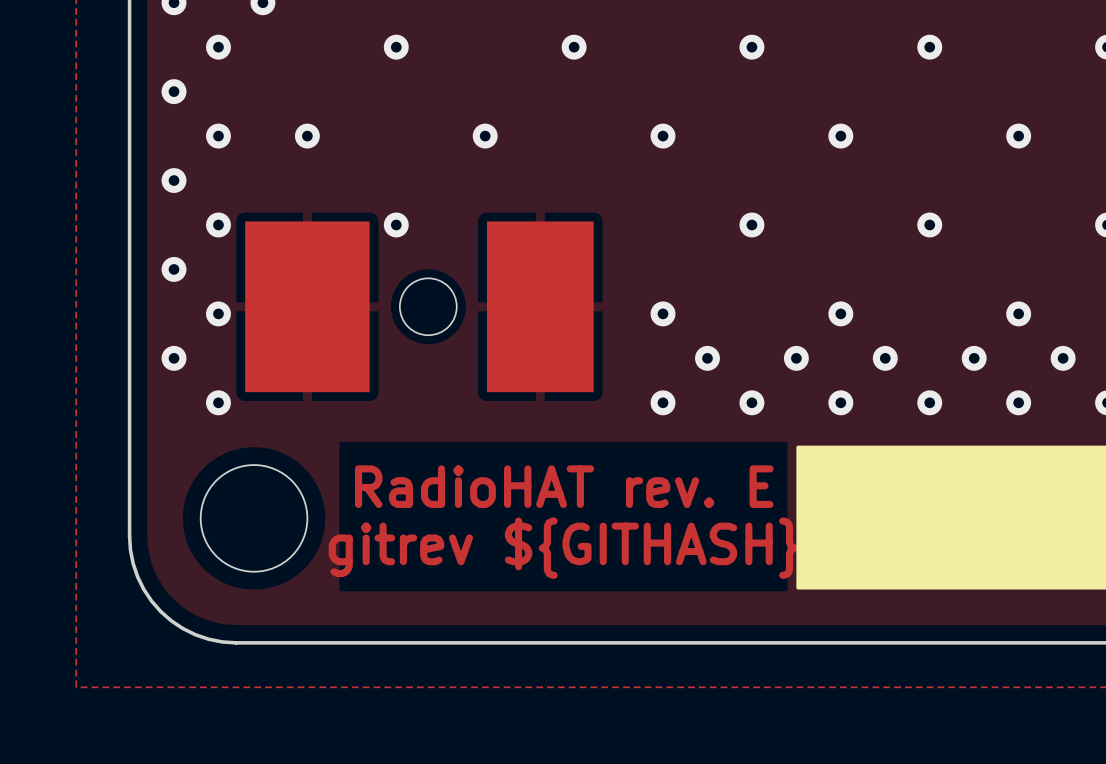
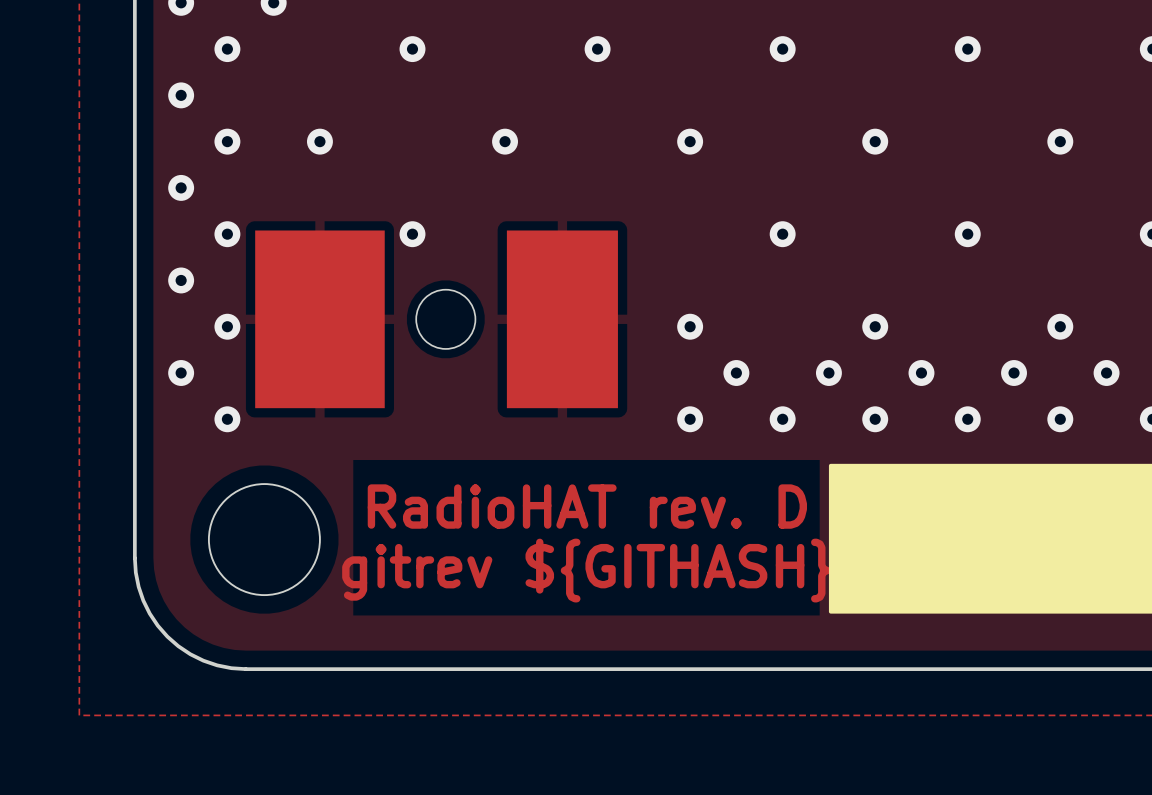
text: RadioHAT rev. E (564, 486) -> RadioHAT rev. D (587, 506)

